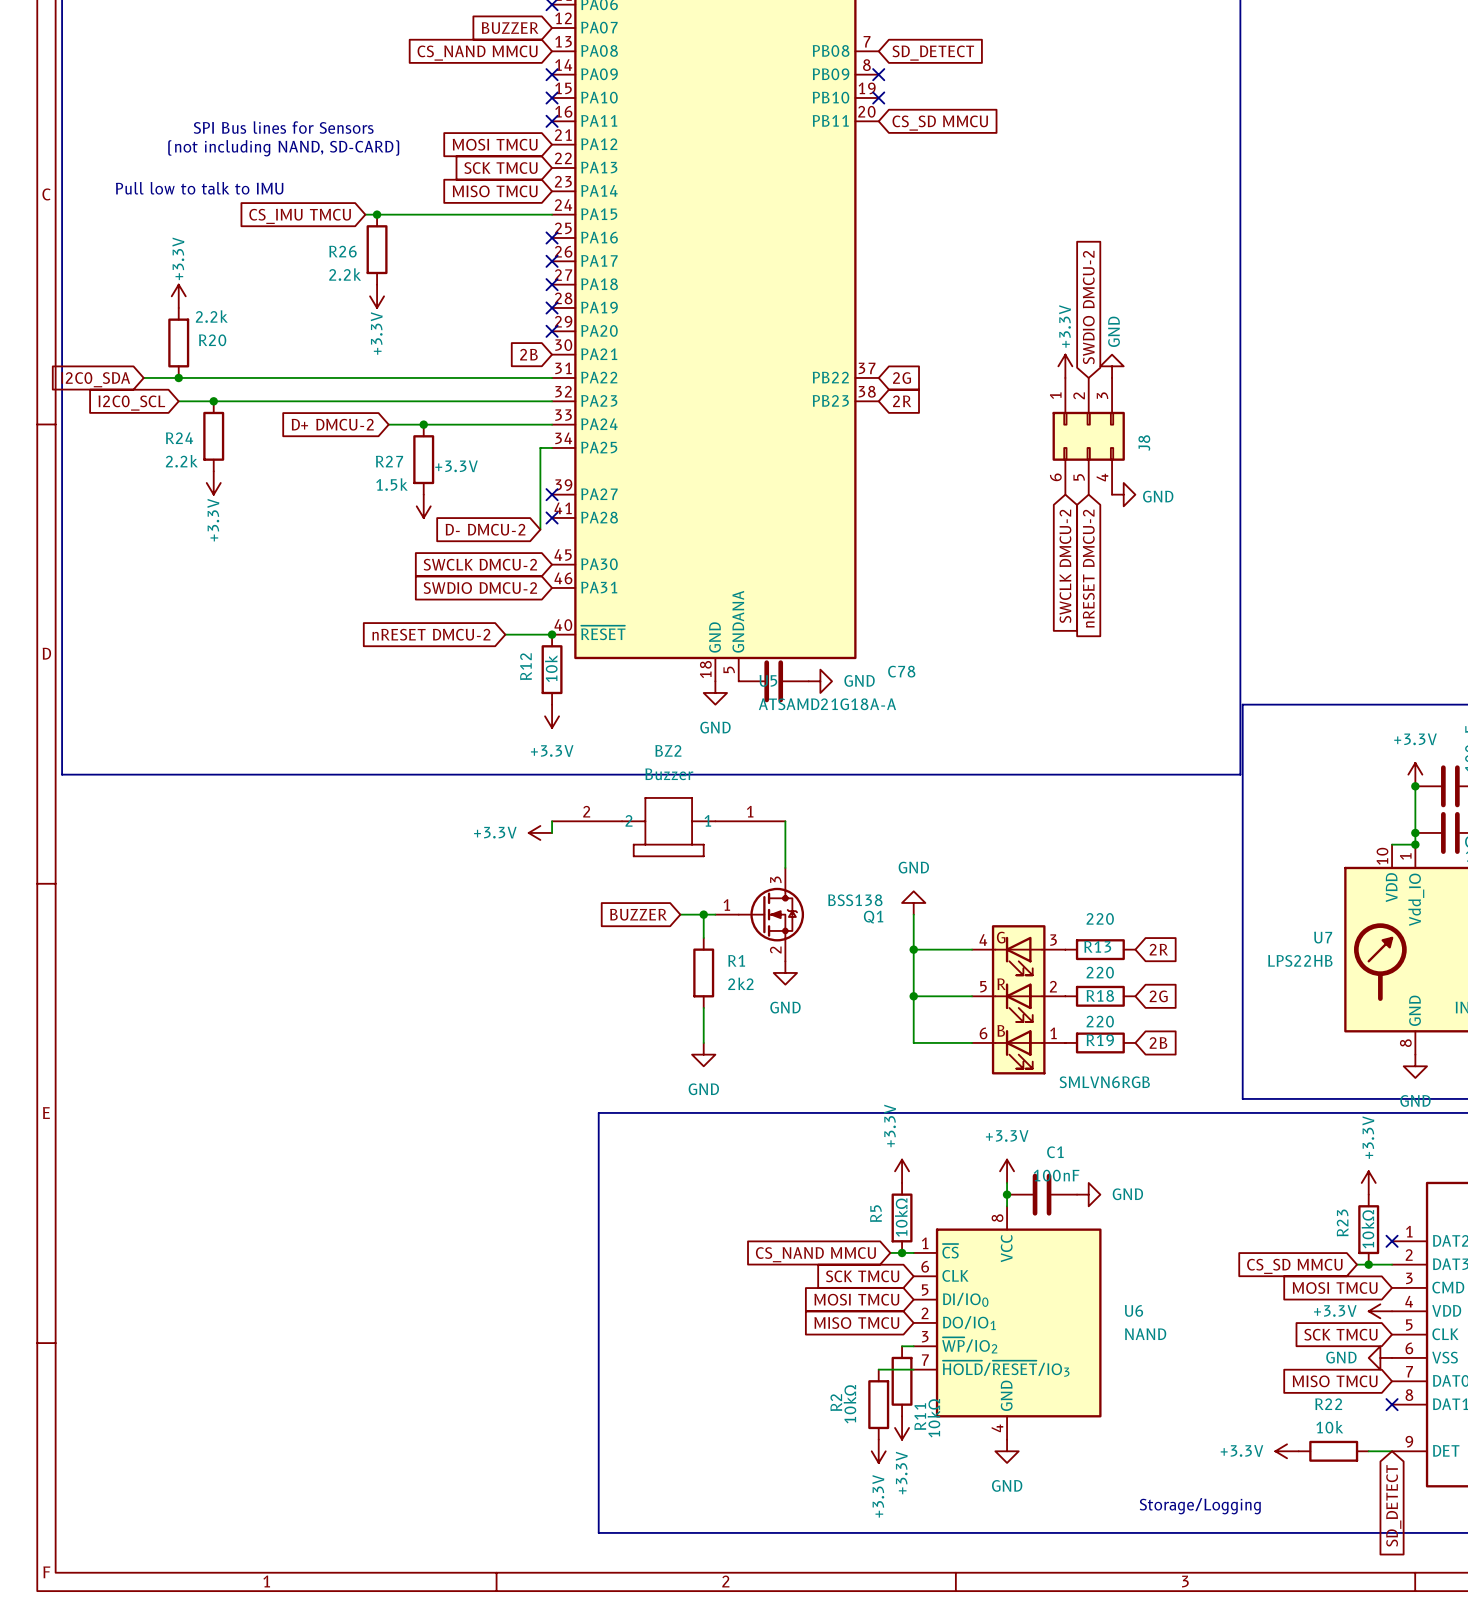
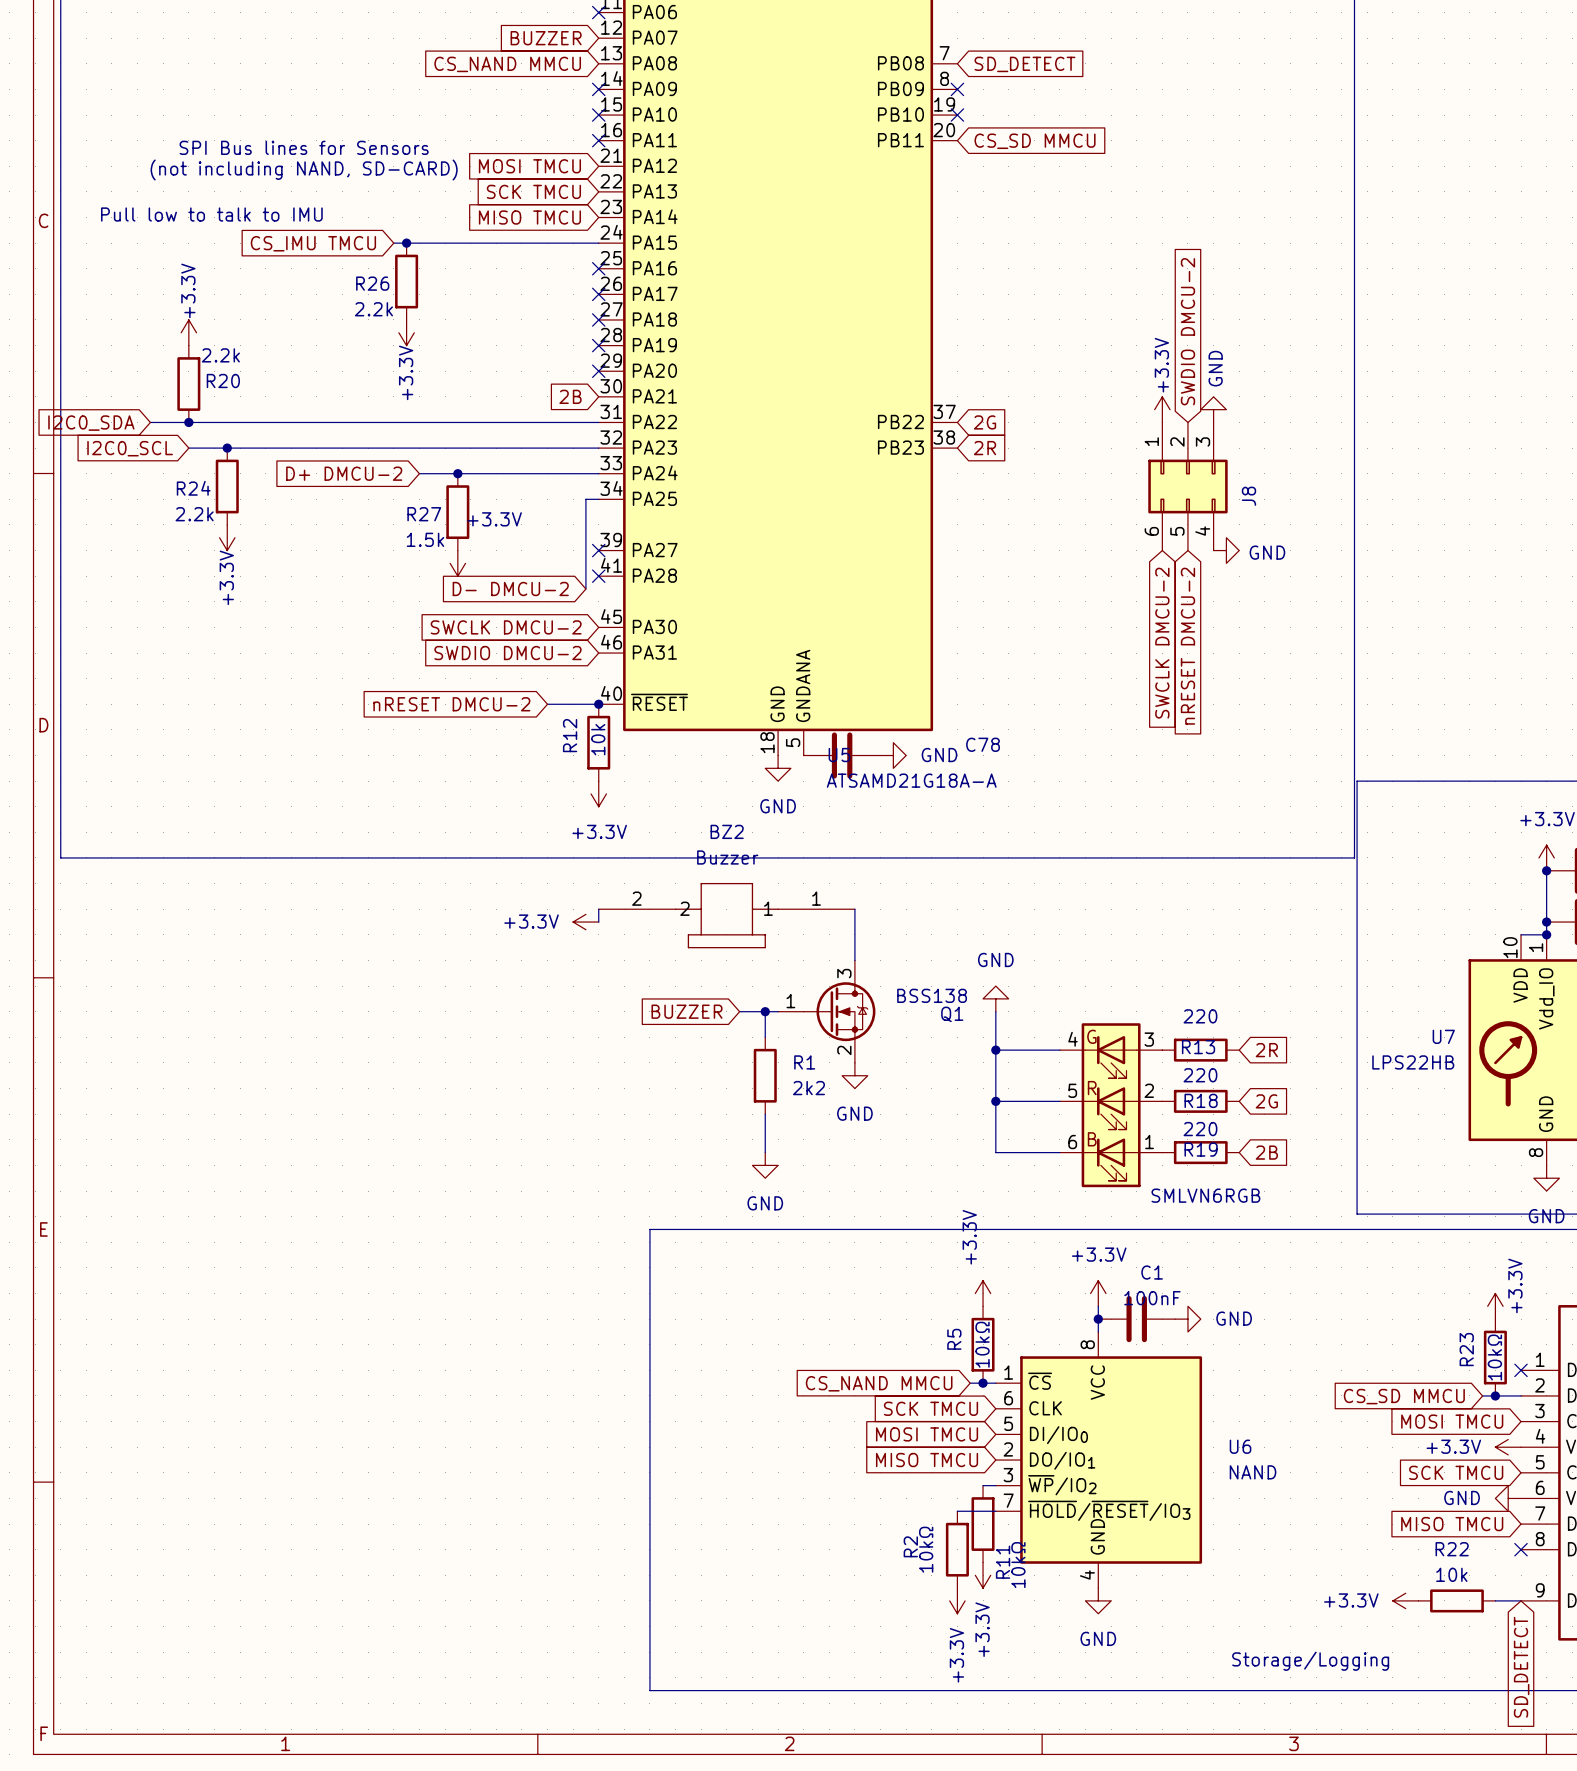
power symbol text position: +3.3V (1368, 1137) -> +3.3V (1515, 1285)

